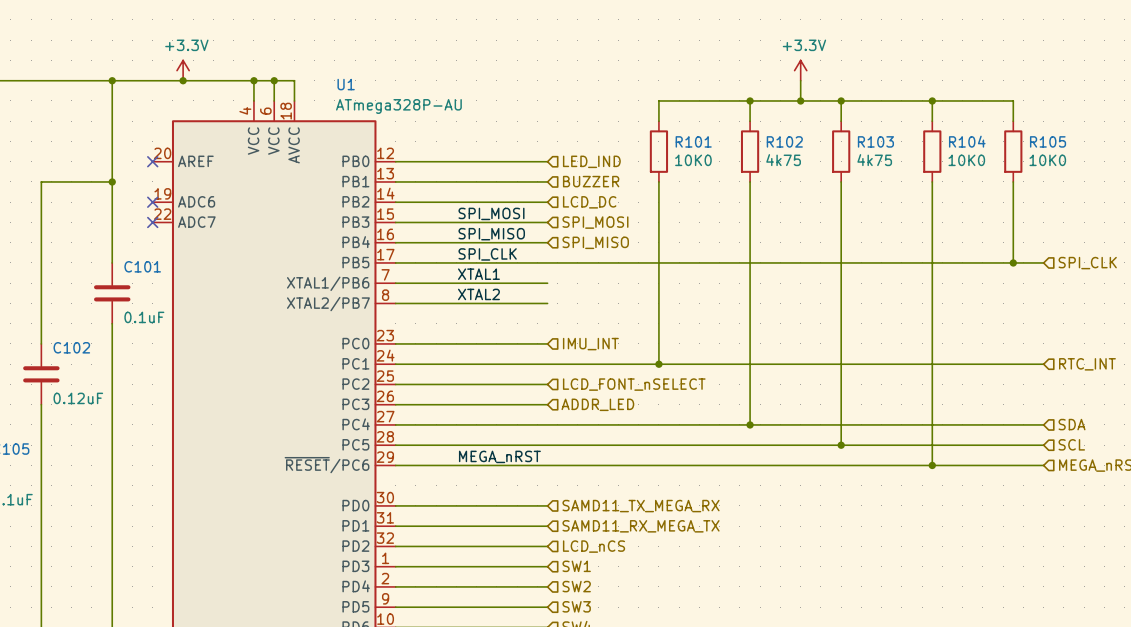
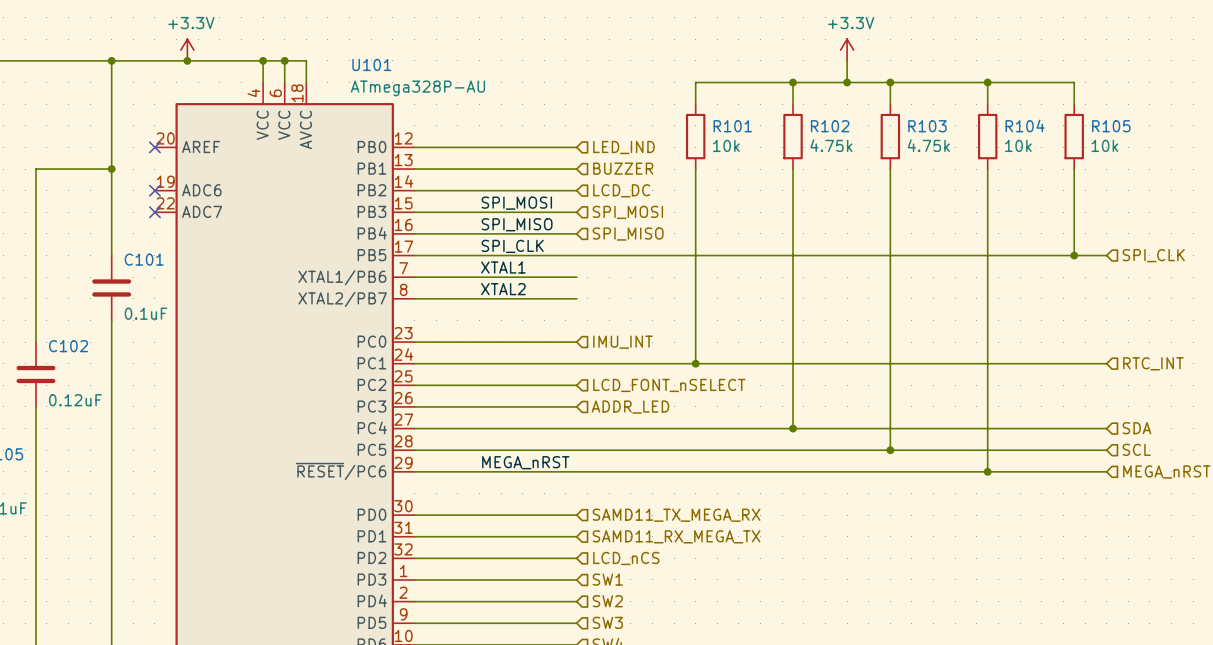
U1 name: U1 (346, 84) -> U101 (371, 64)
R101 value: 10K0 (693, 160) -> 10k (726, 145)
R102 value: 4k75 (783, 160) -> 4.75k (831, 145)
R103 value: 4k75 (874, 160) -> 4.75k (928, 145)
R104 value: 10K0 (966, 160) -> 10k (1018, 145)
R105 value: 10K0 (1047, 160) -> 10k (1104, 145)

